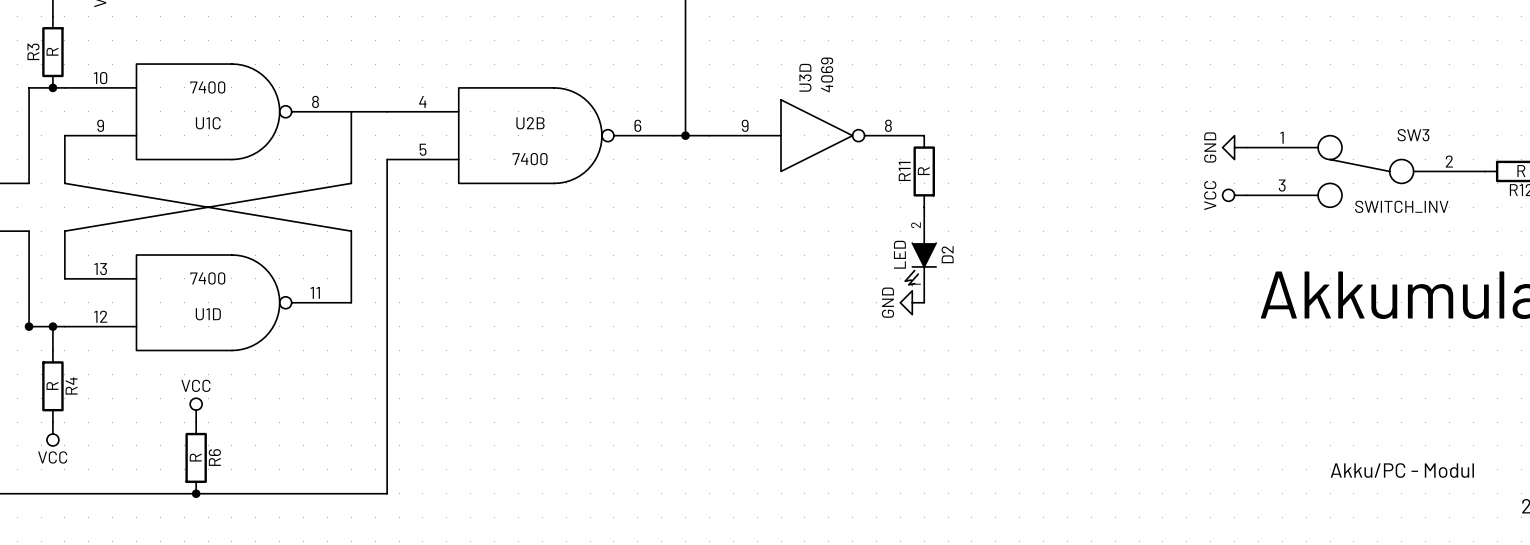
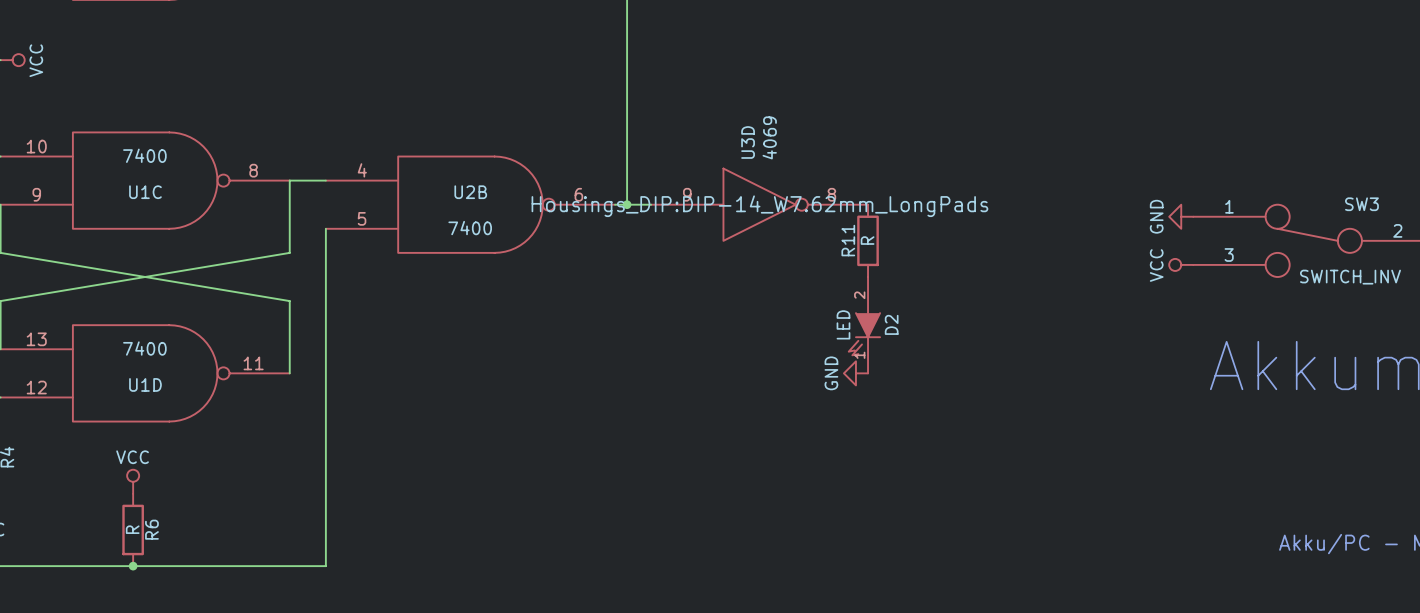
U3D text: none -> Housings_DIP:DIP-14_W7.62mm_LongPads (759, 206)

